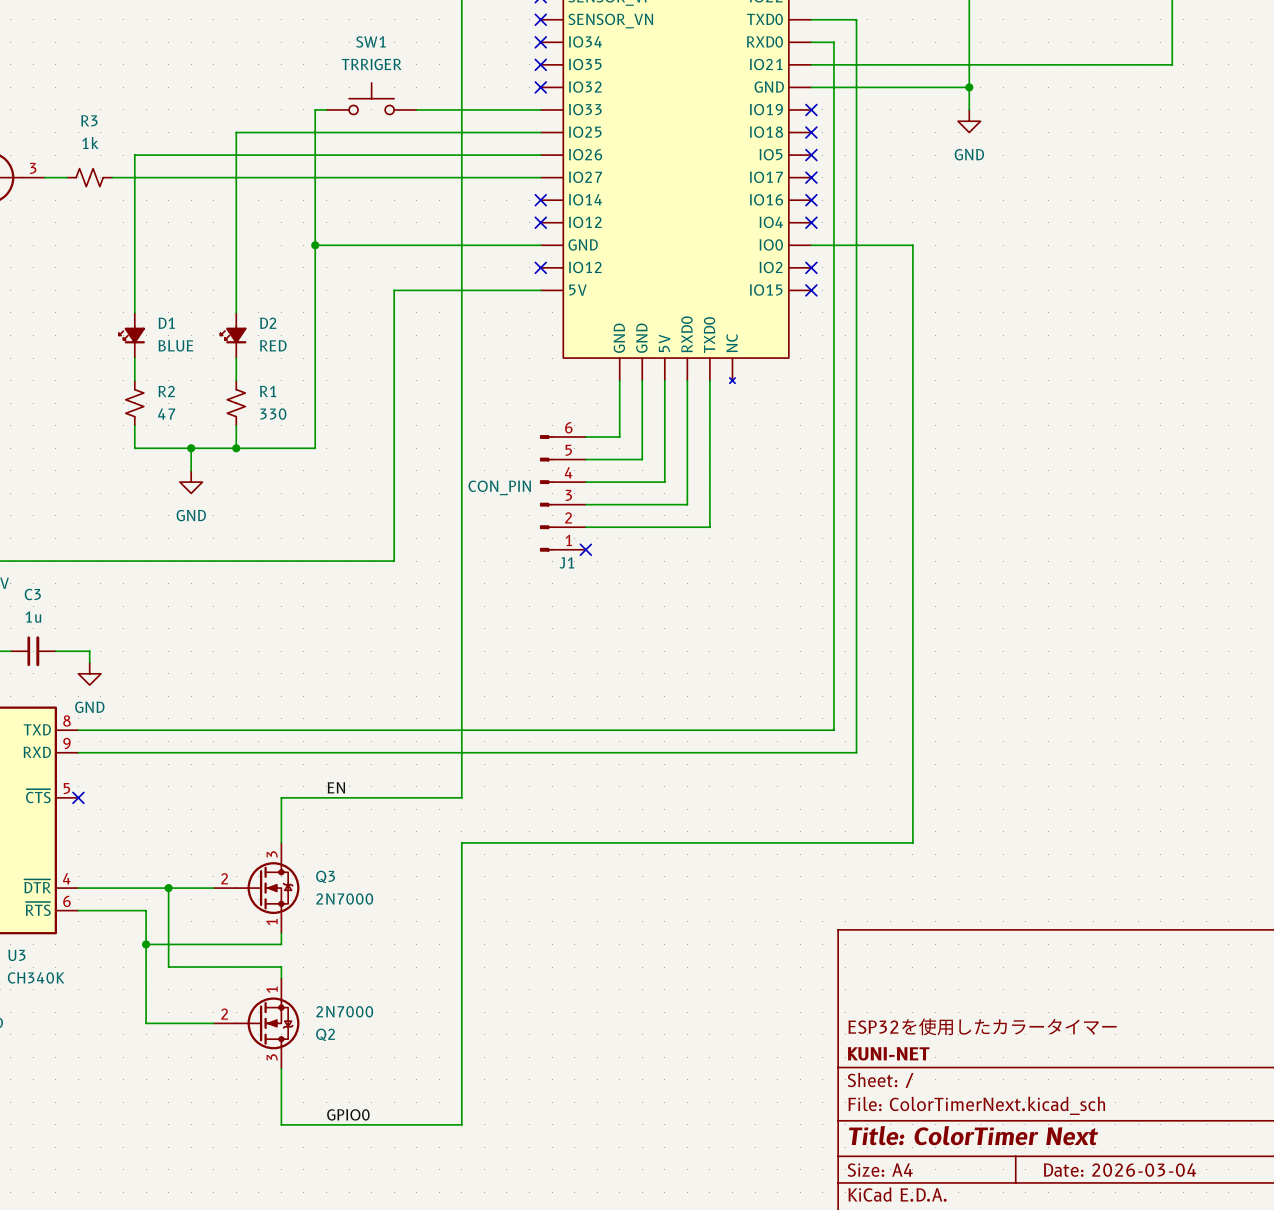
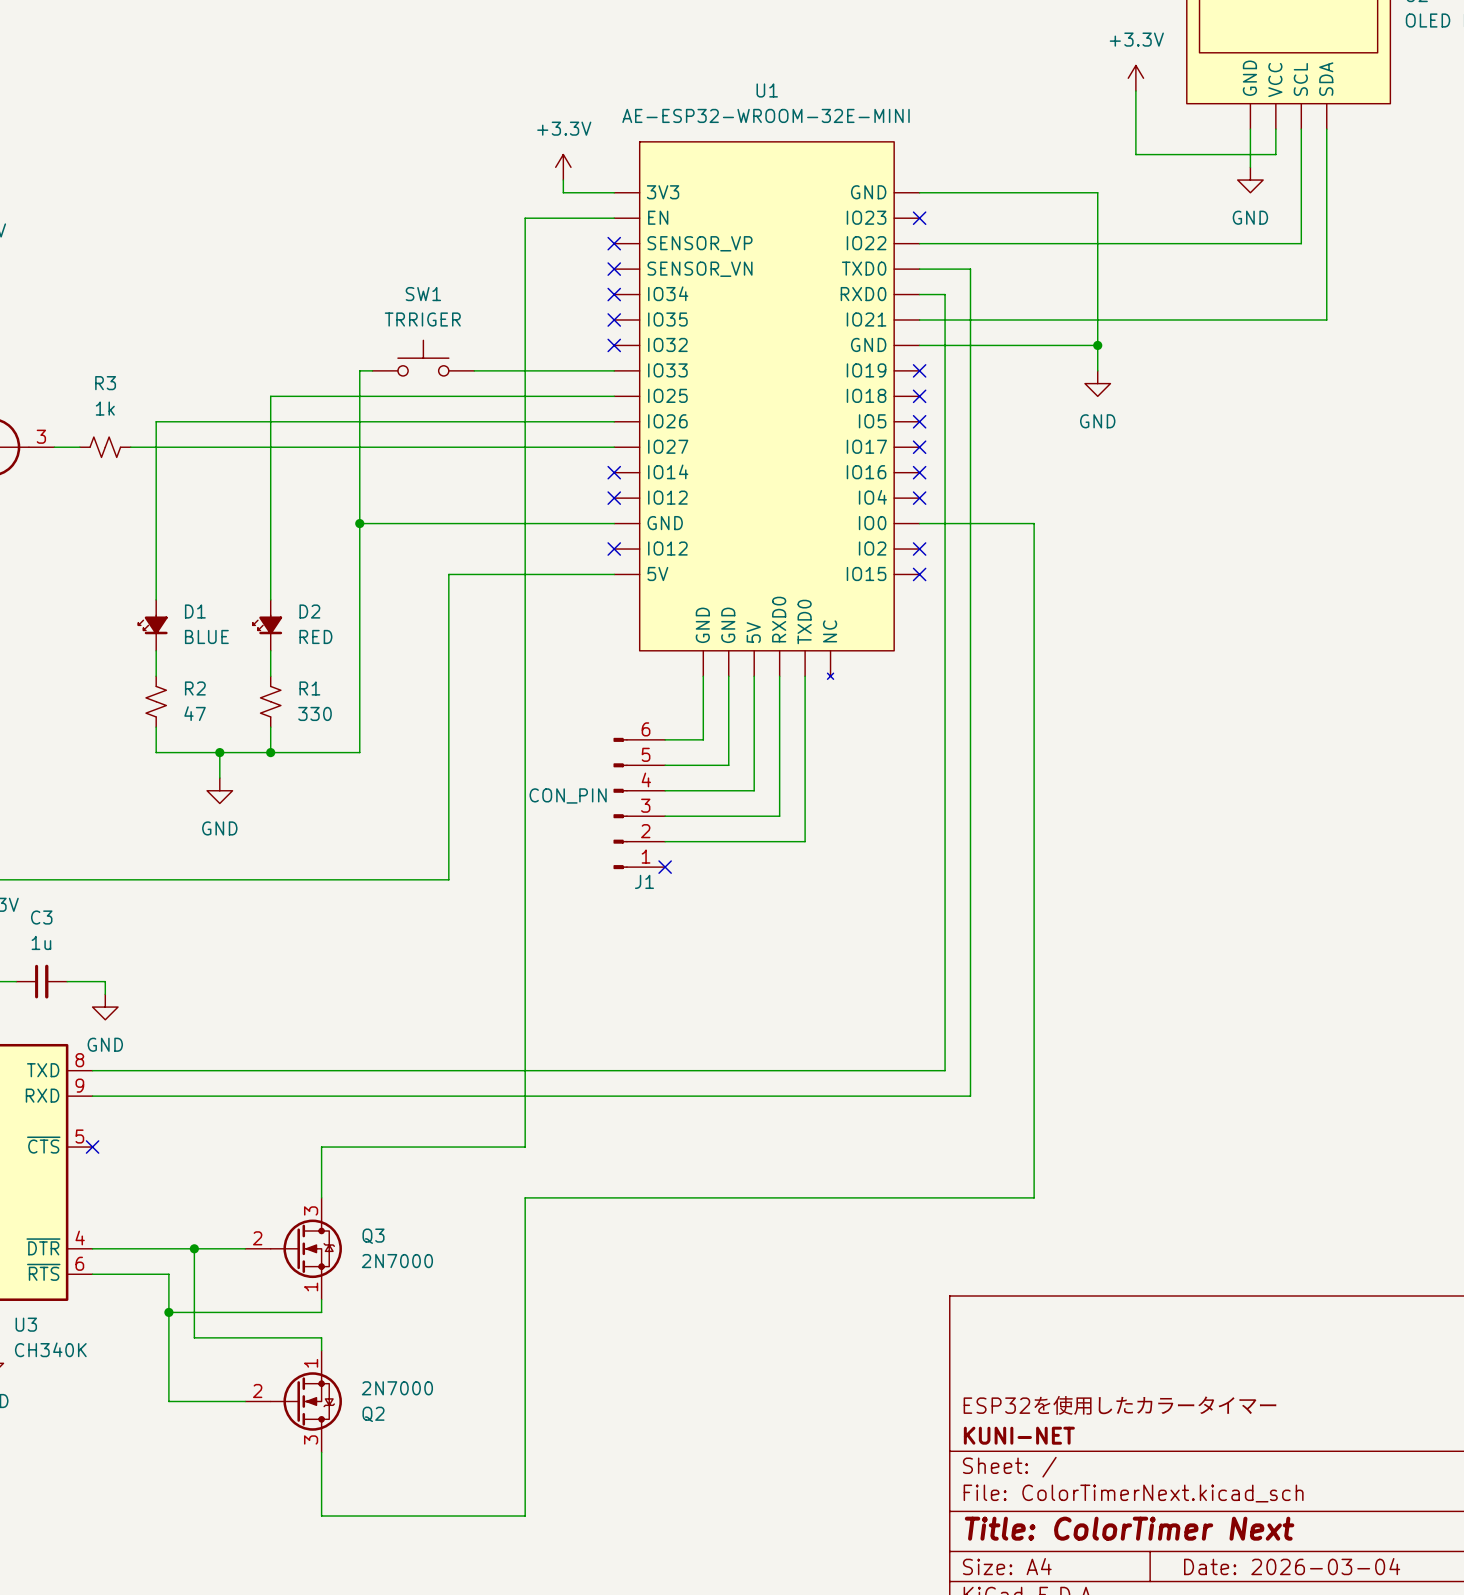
label: EN (336, 787) -> none
label: GPIO0 (348, 1114) -> none

